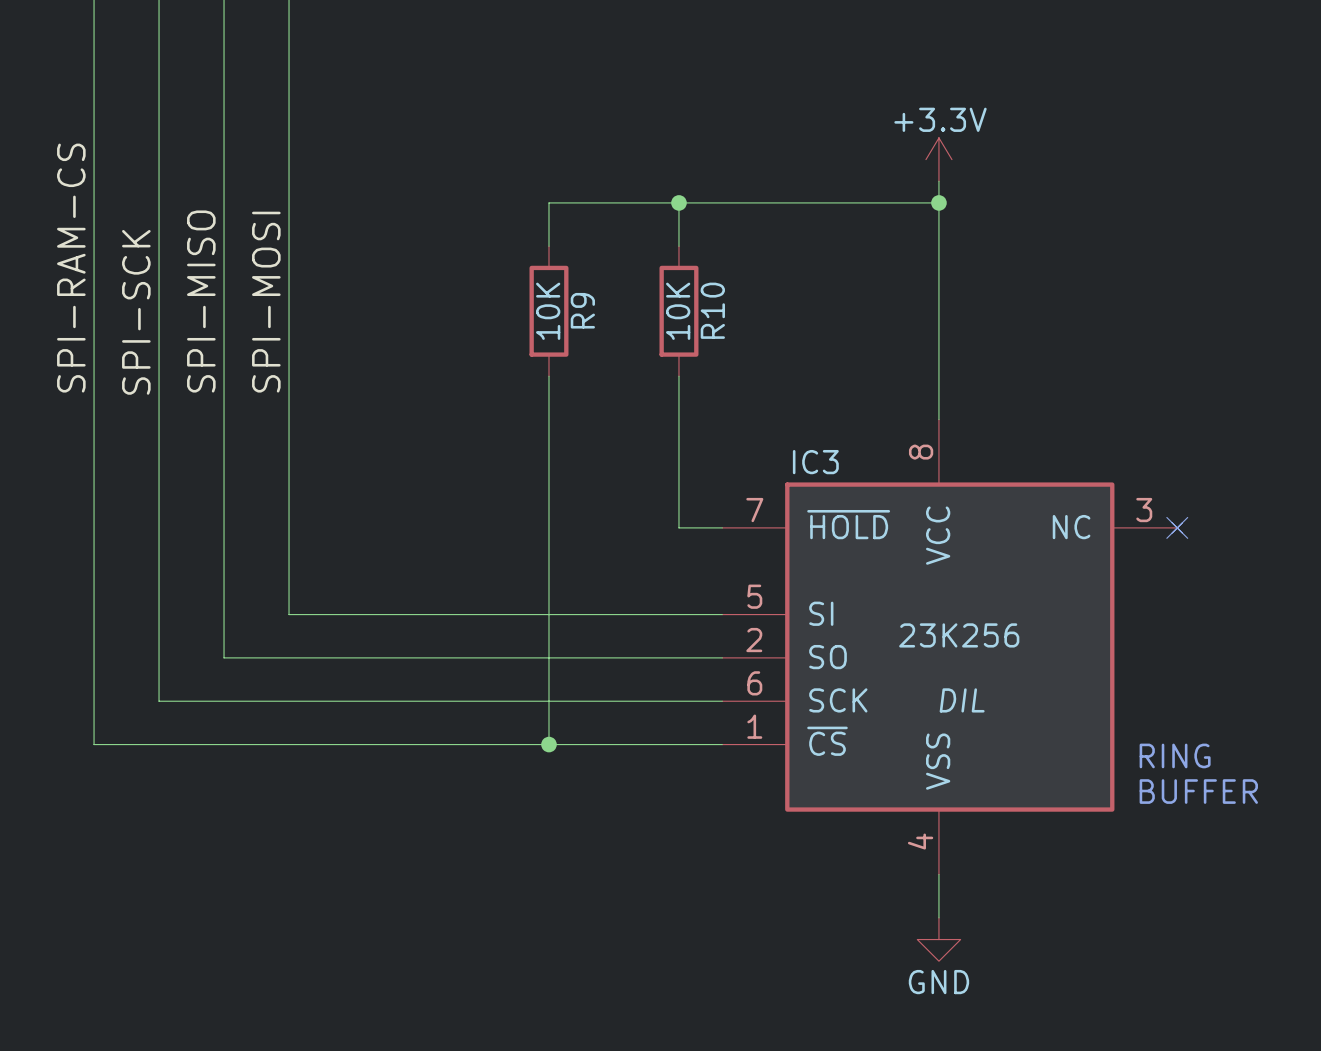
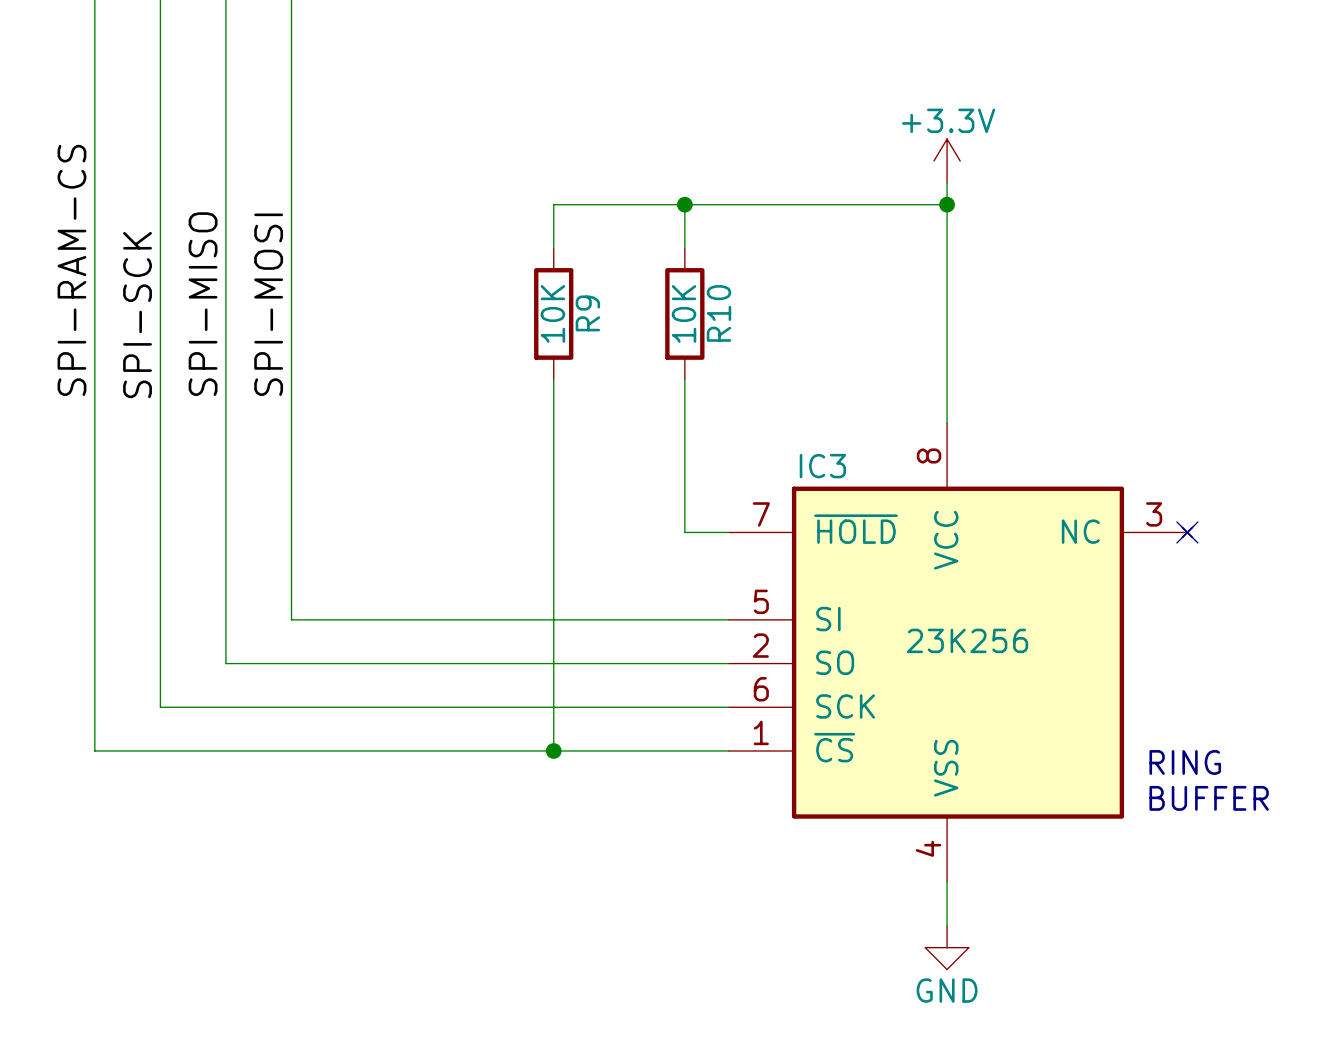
IC3 text: DIL (962, 700) -> none

